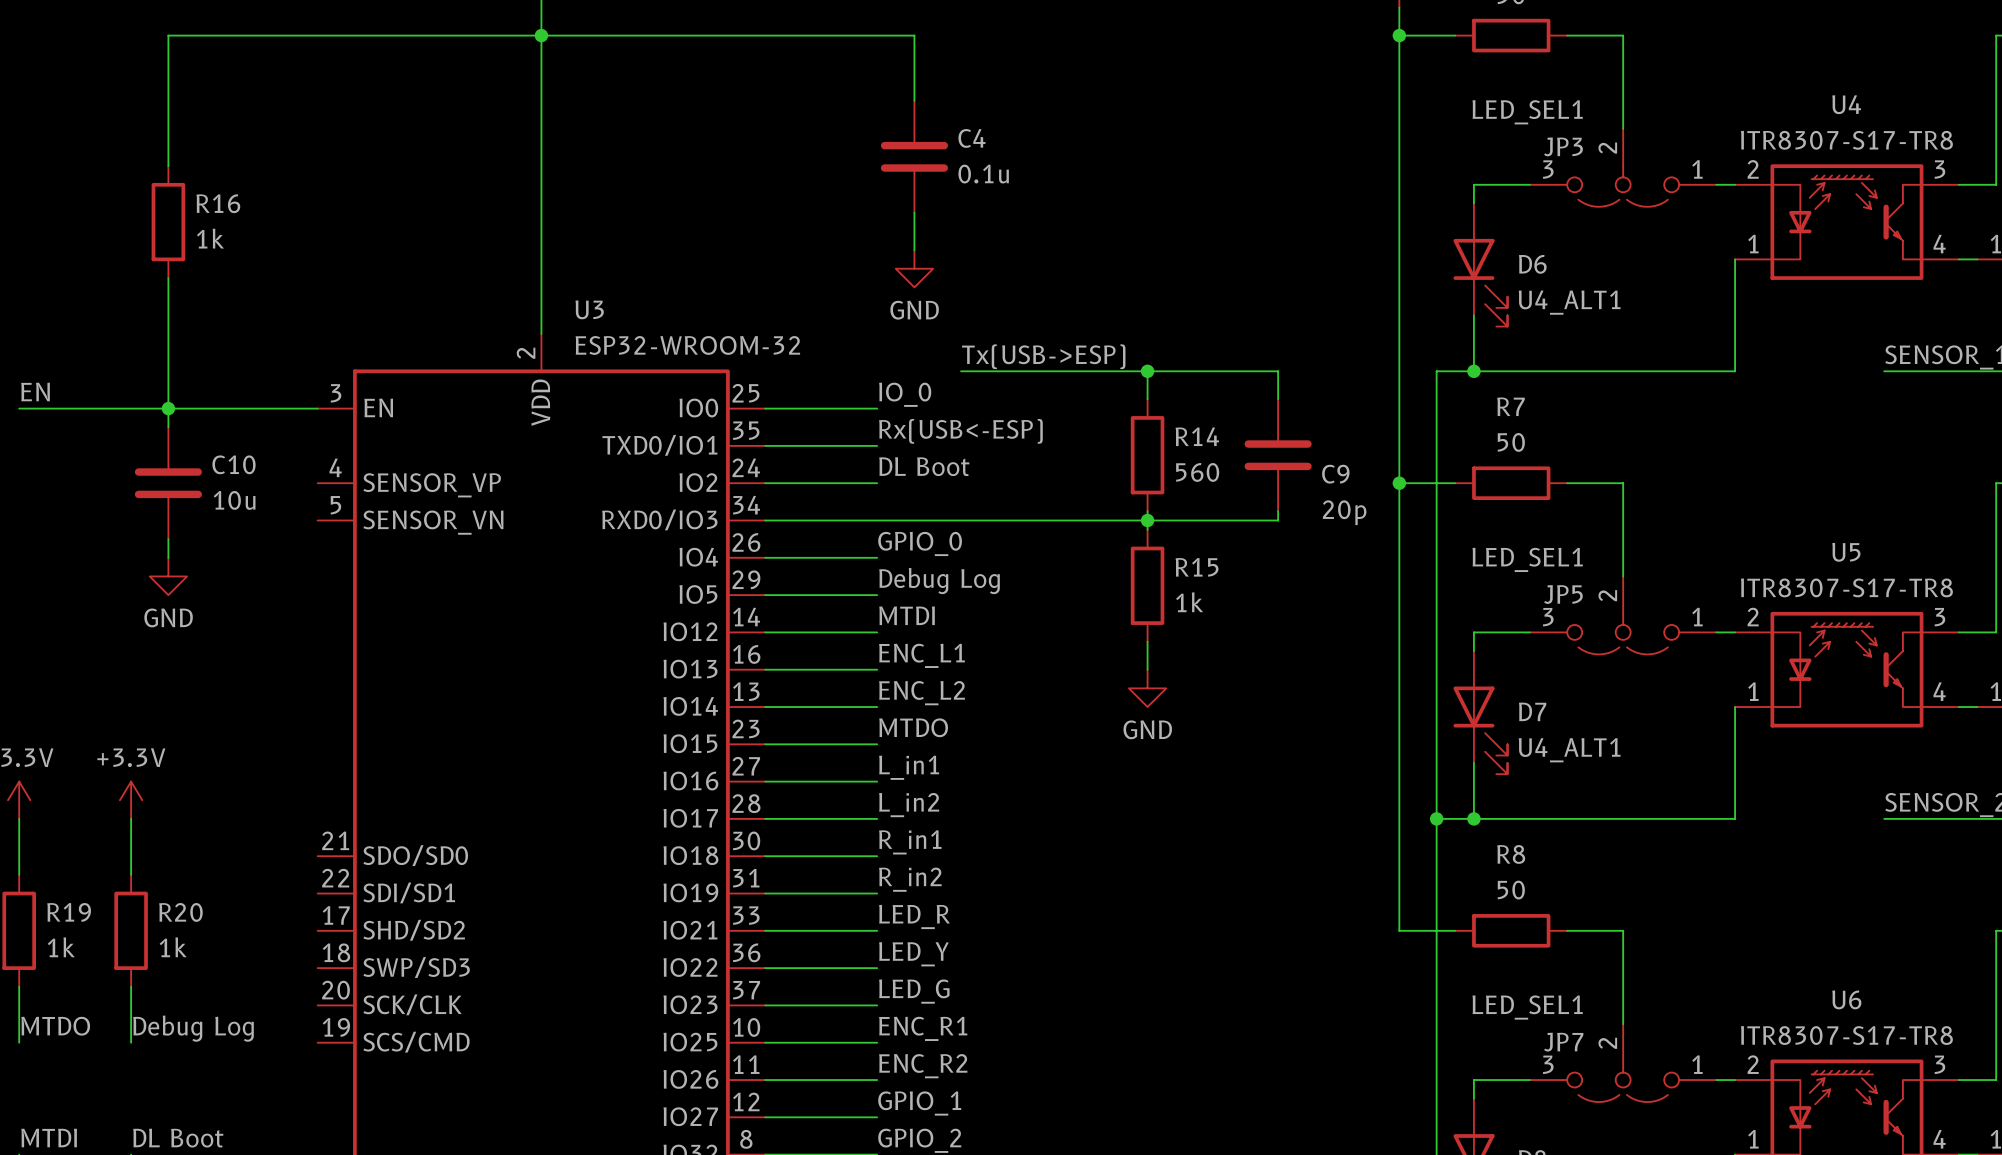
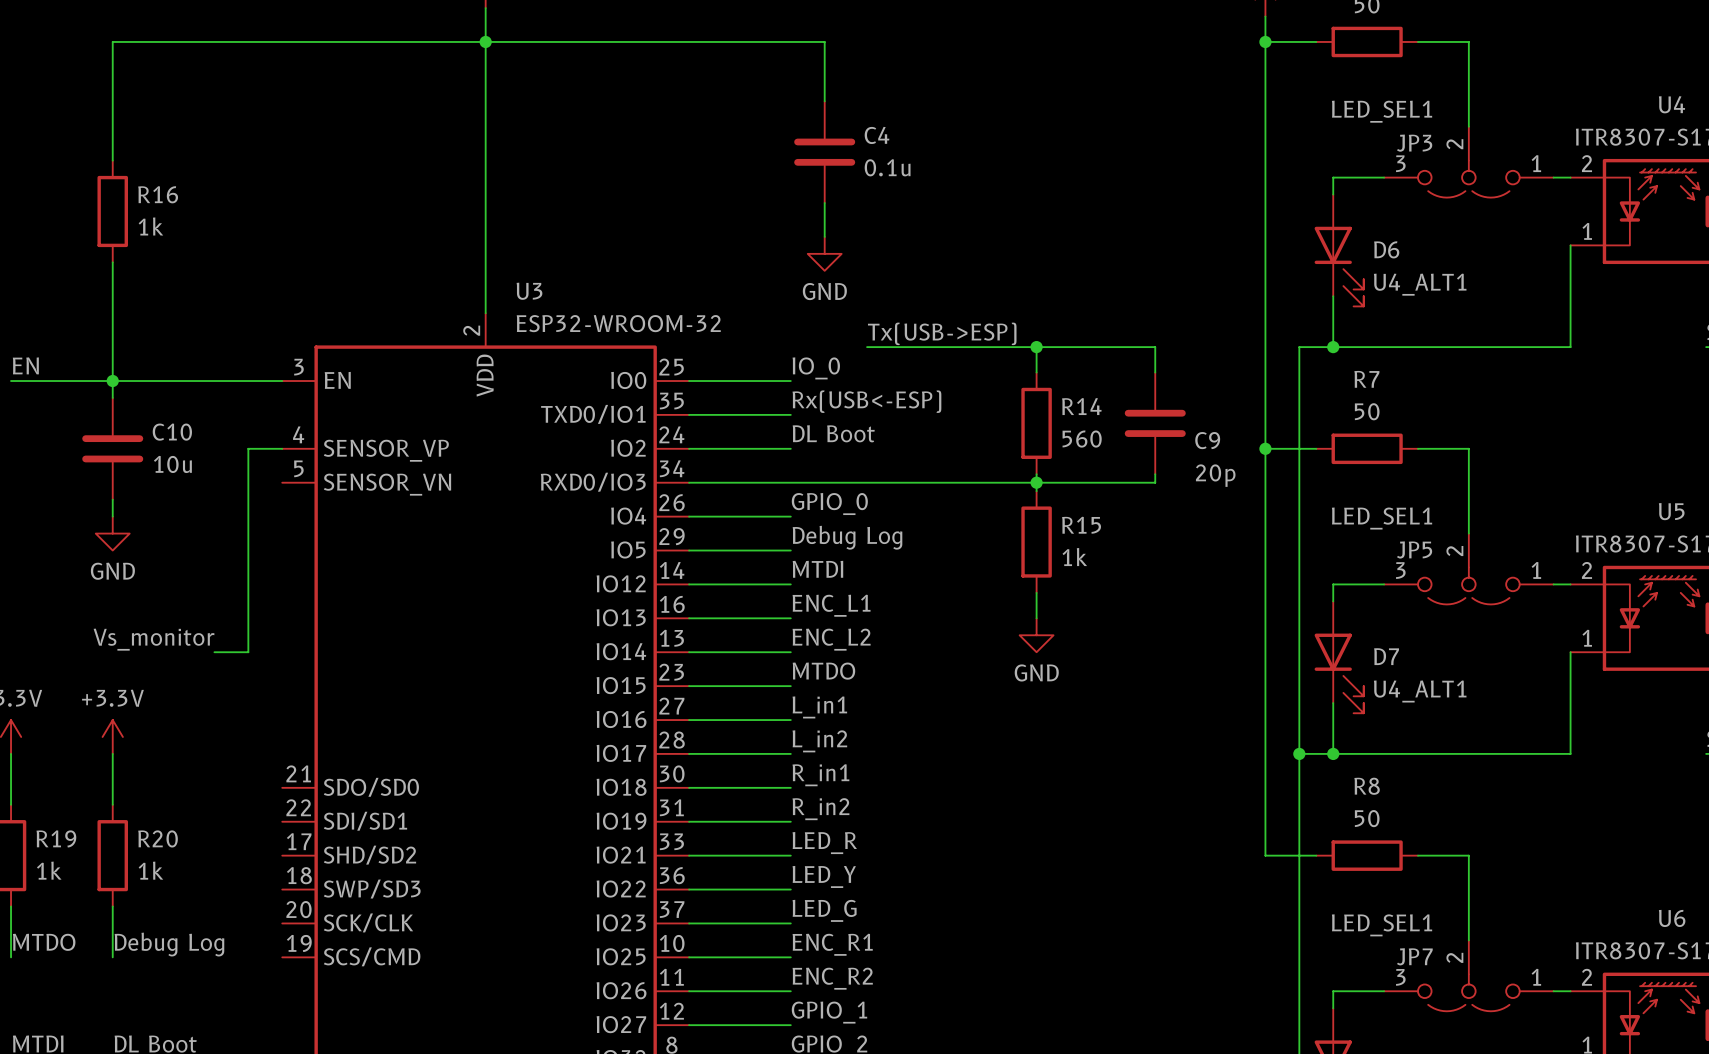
wire: (168, 35) (168, 166) -> (146, 41) (112, 41) (112, 160)
R16 position: (168, 222) -> (112, 211)
wire: (168, 278) (168, 427) -> (112, 262) (112, 397)
junction position: (168, 408) -> (112, 381)
C10 position: (168, 483) -> (112, 448)
wire: none -> (282, 448) (248, 448) (248, 652) (214, 652)
wire: (168, 539) (168, 557) -> (112, 499) (112, 516)
power symbol position: GND (168, 576) -> GND (112, 533)
label: none -> Vs_monitor (154, 639)

